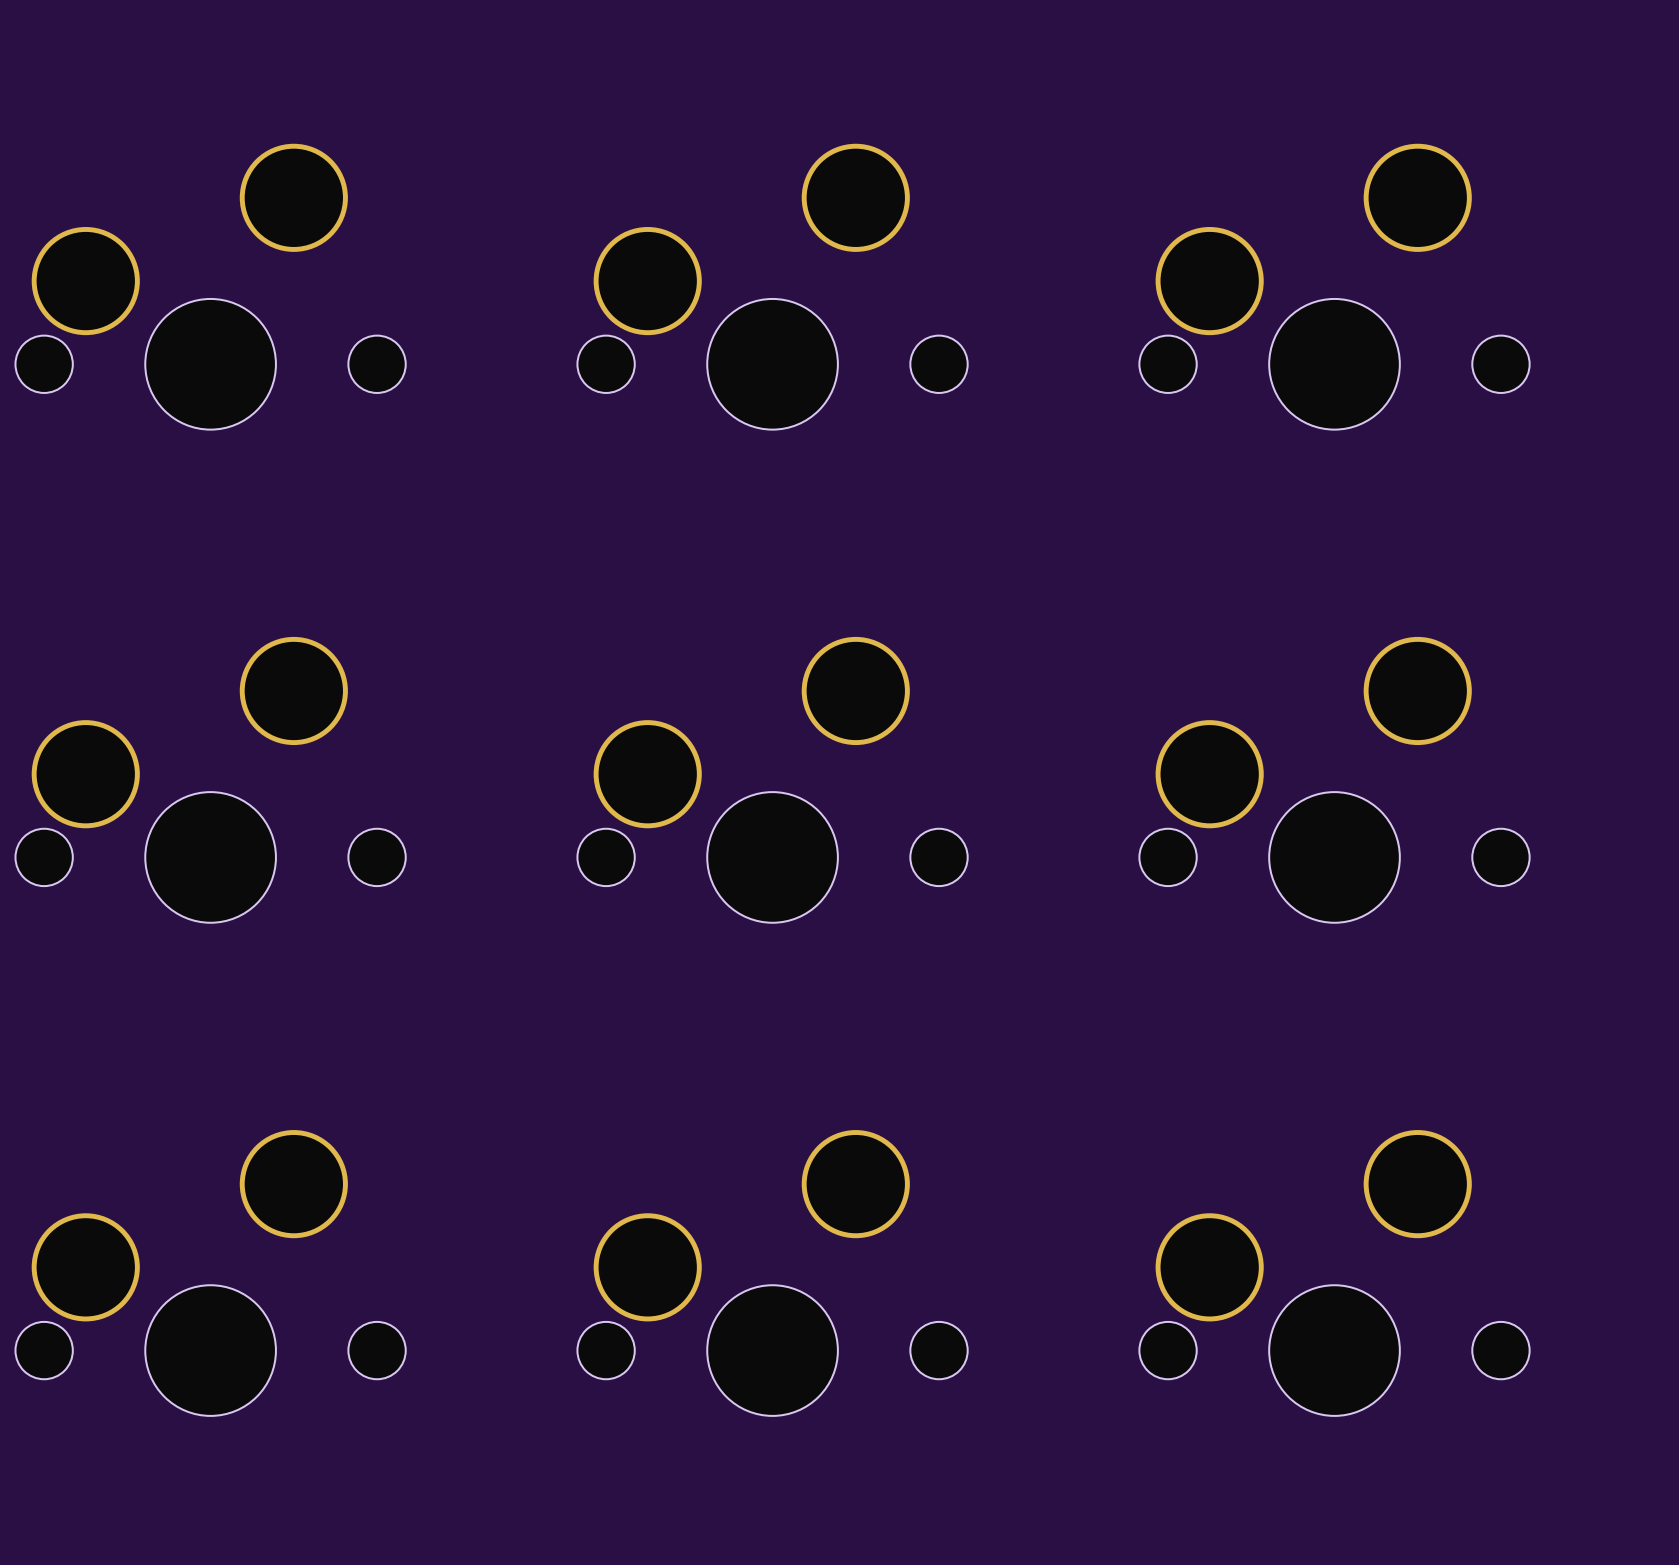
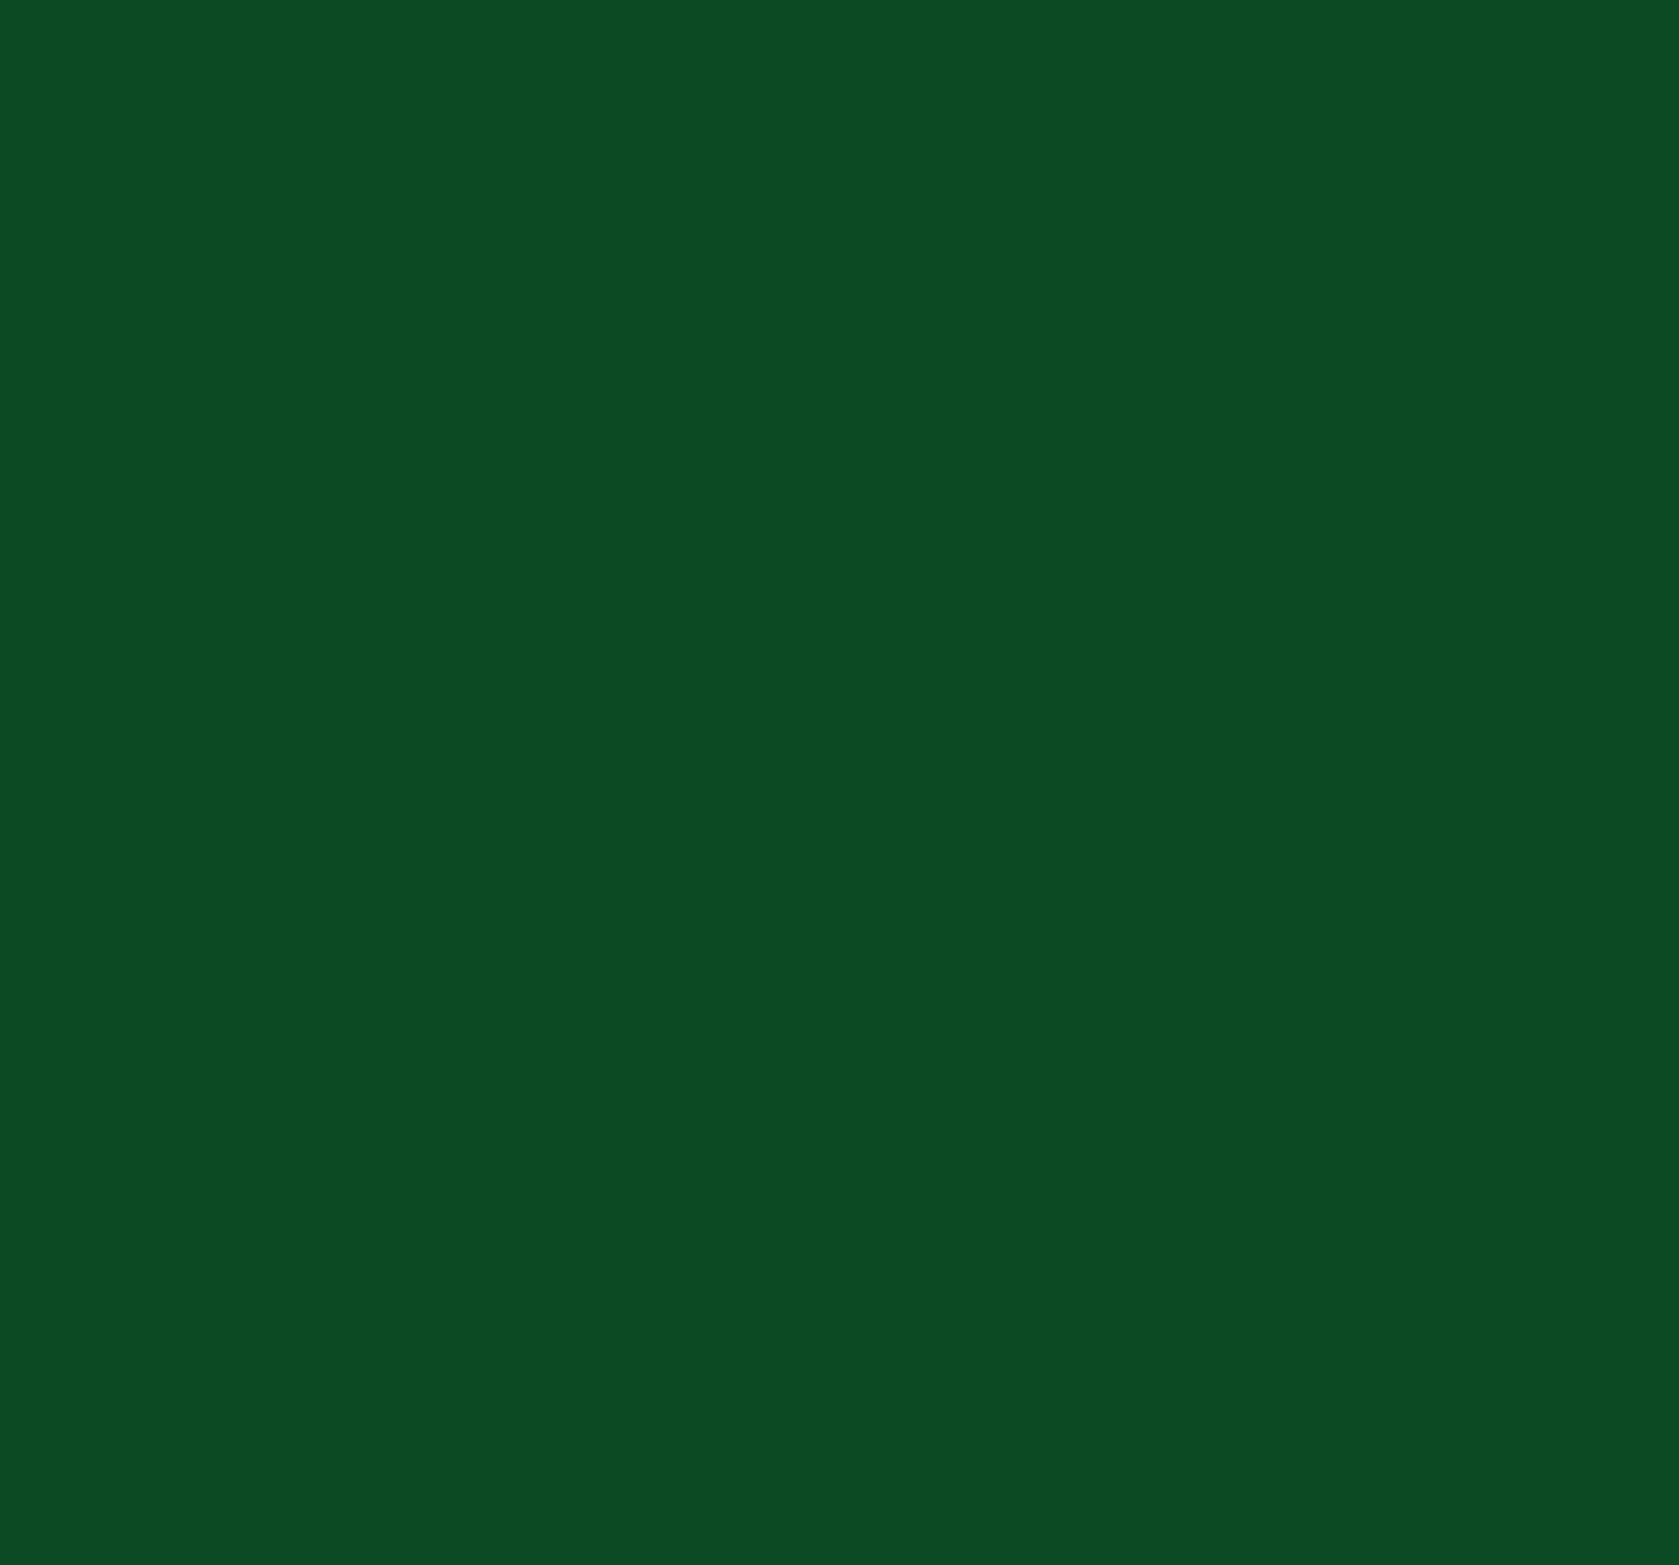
part: (210, 286) -> none
part: (772, 286) -> none
part: (1334, 286) -> none
part: (210, 779) -> none
part: (772, 779) -> none
part: (1334, 779) -> none
part: (210, 1272) -> none
part: (772, 1272) -> none
part: (1334, 1272) -> none

